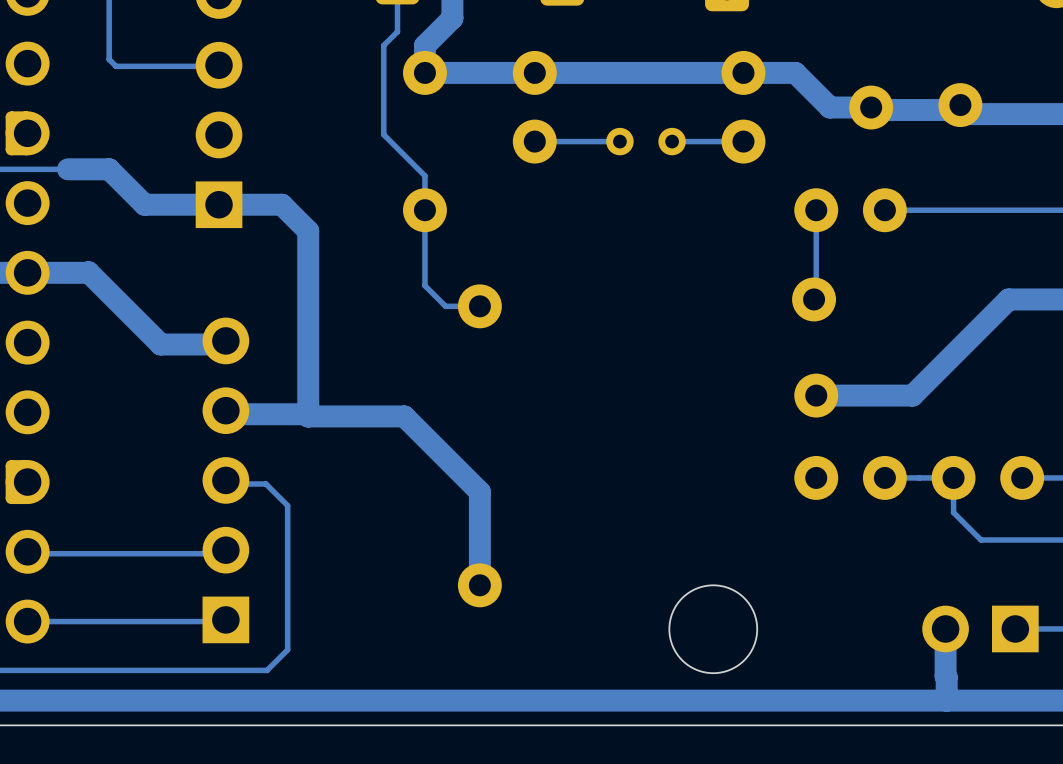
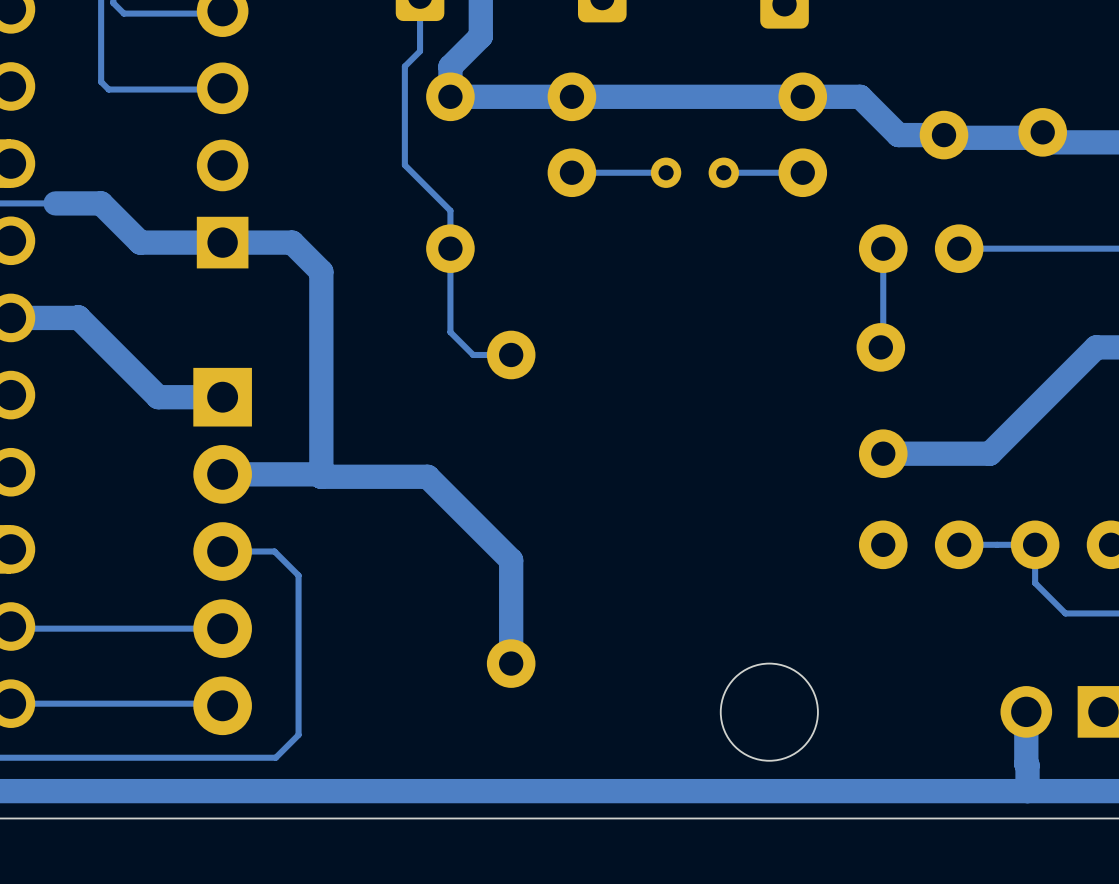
part footprint: [202, 317, 250, 644] -> [193, 367, 252, 736]

